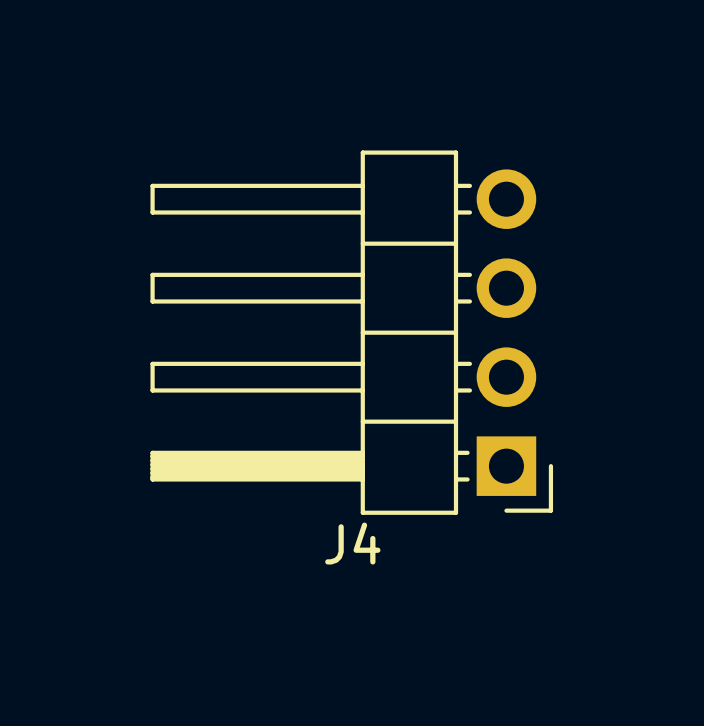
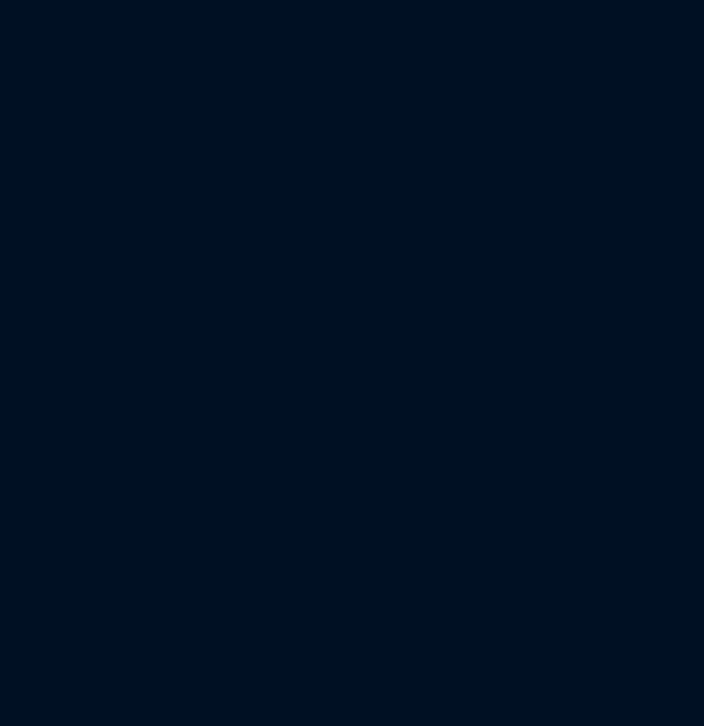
J4: (351, 332) -> none

